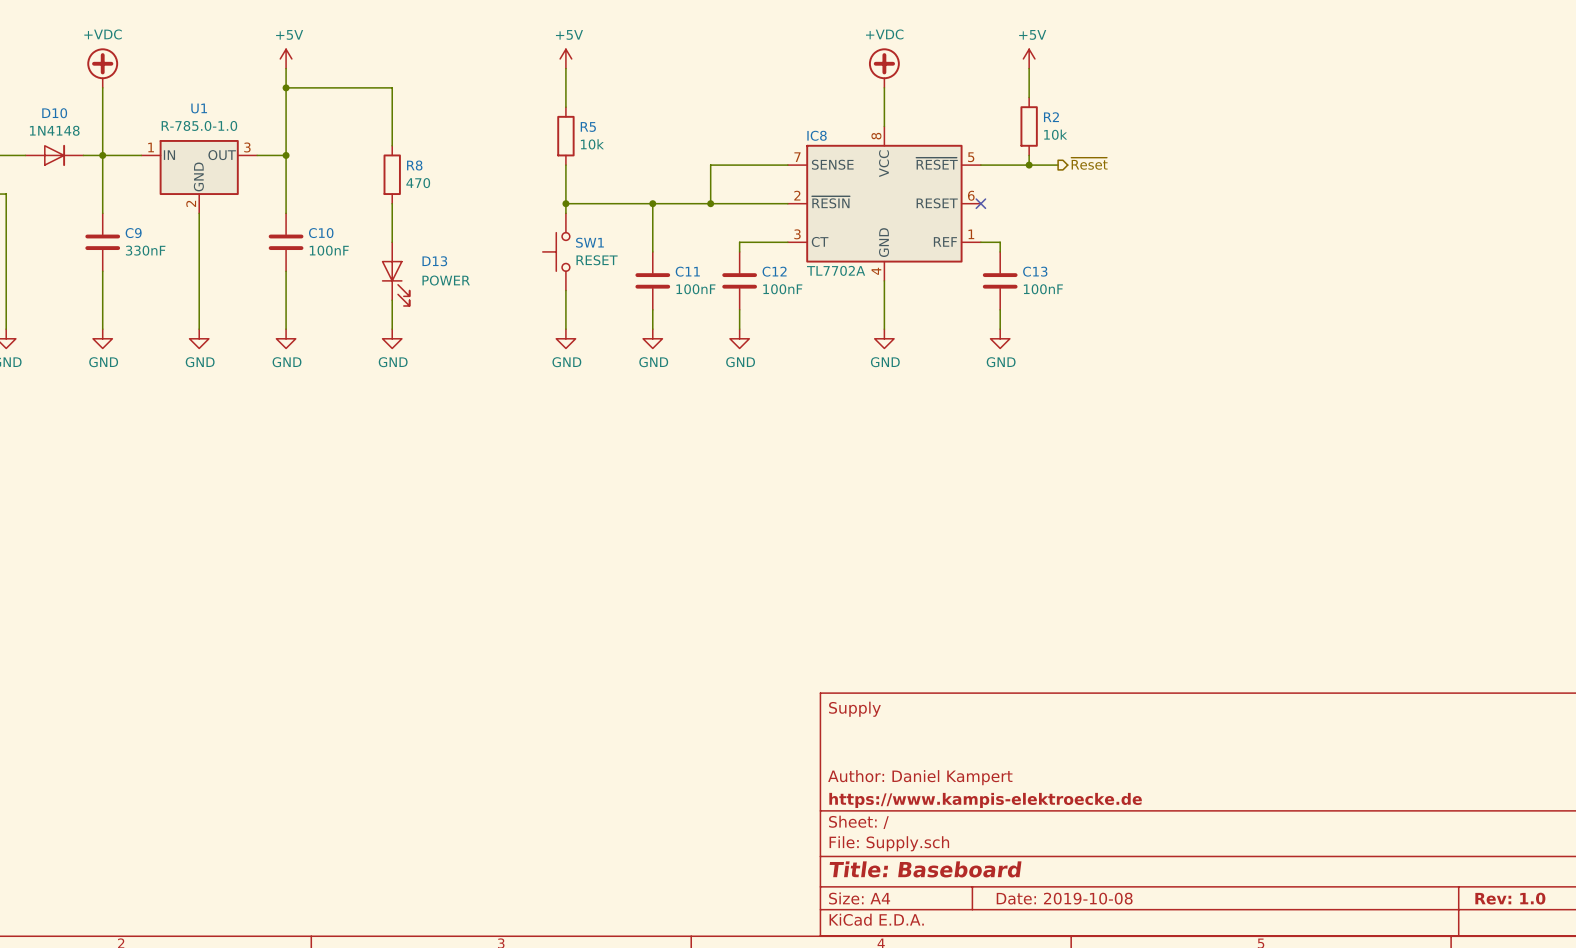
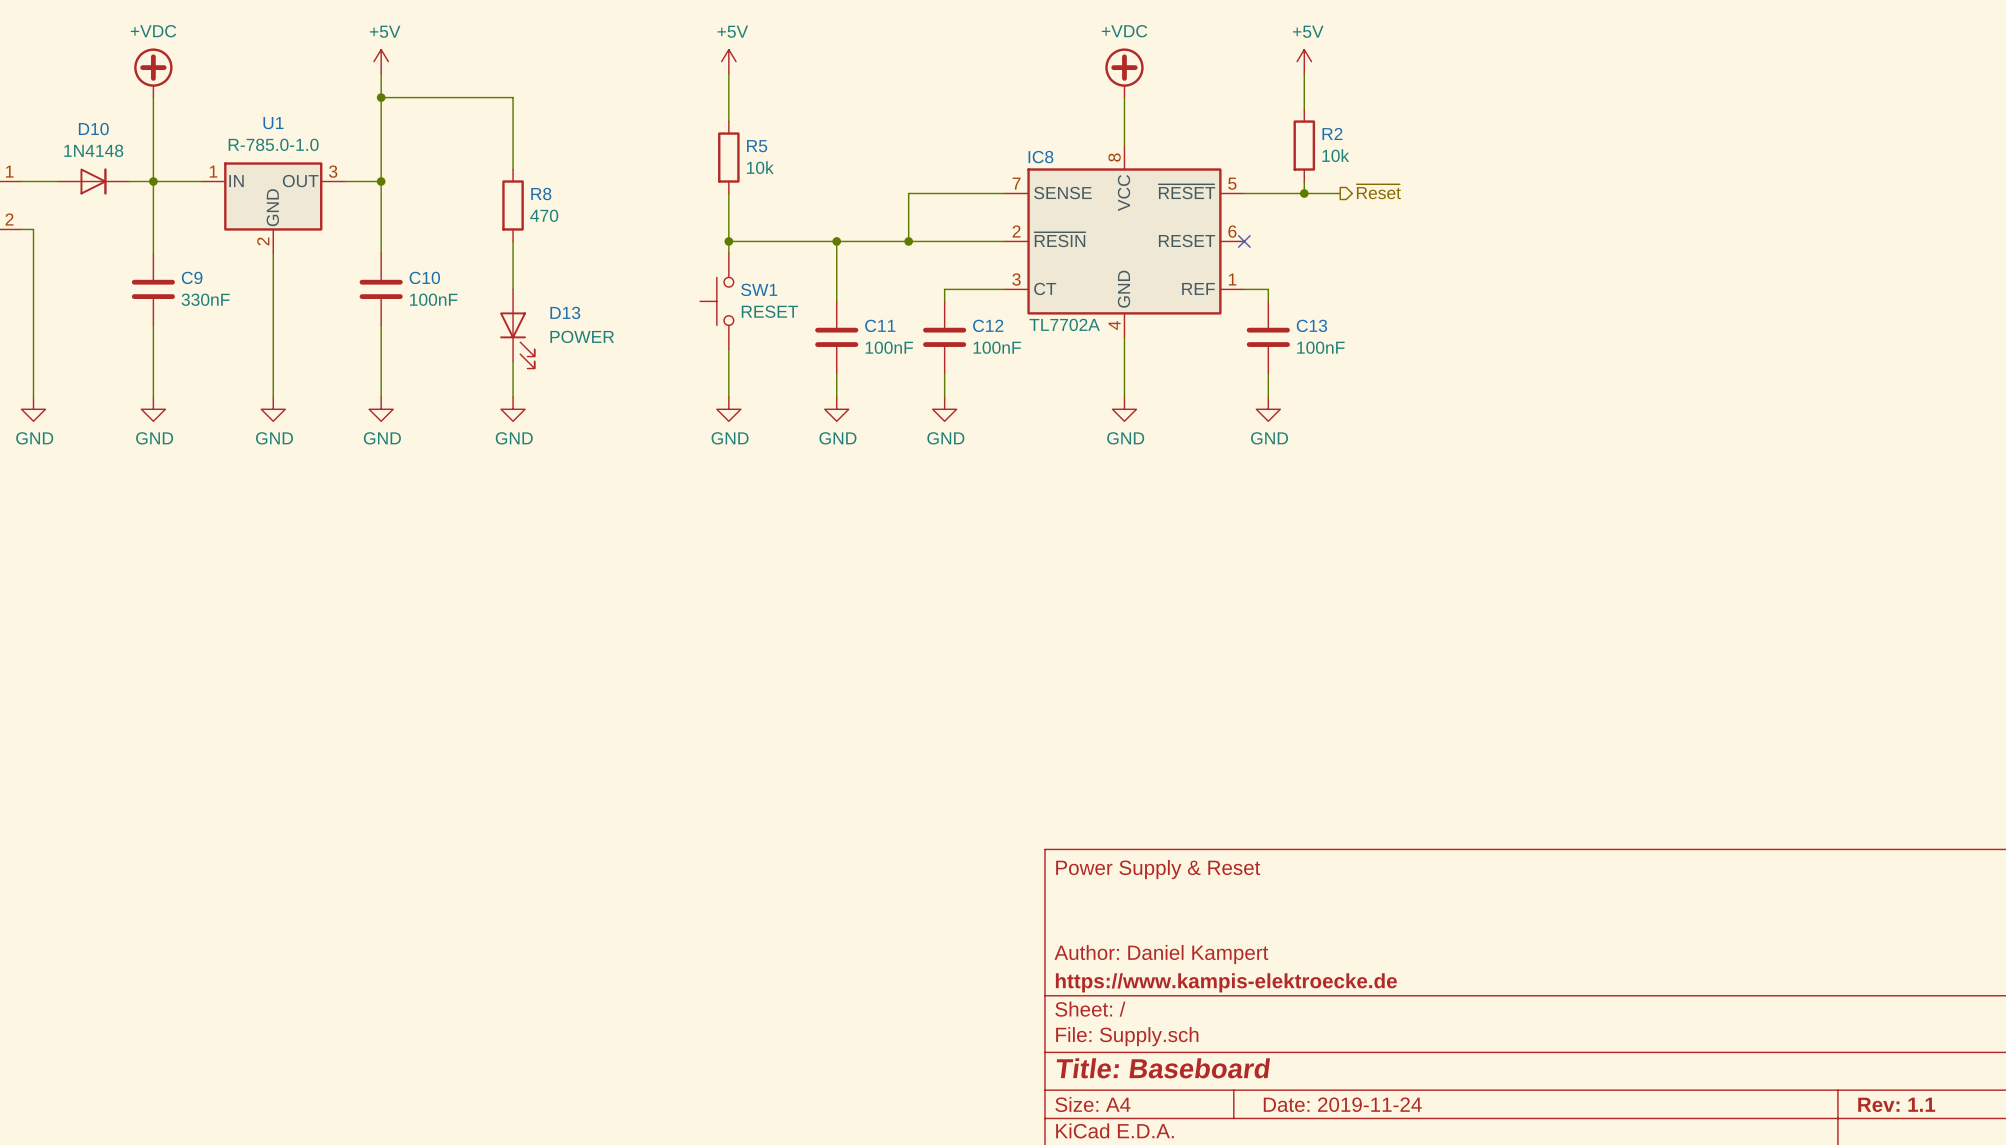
title block: Supply (854, 709) -> Power Supply & Reset (1158, 869)
title block: Date: 2019-10-08 (1064, 898) -> Date: 2019-11-24 (1342, 1104)
title block: Rev: 1.0 (1510, 898) -> Rev: 1.1 (1896, 1104)

